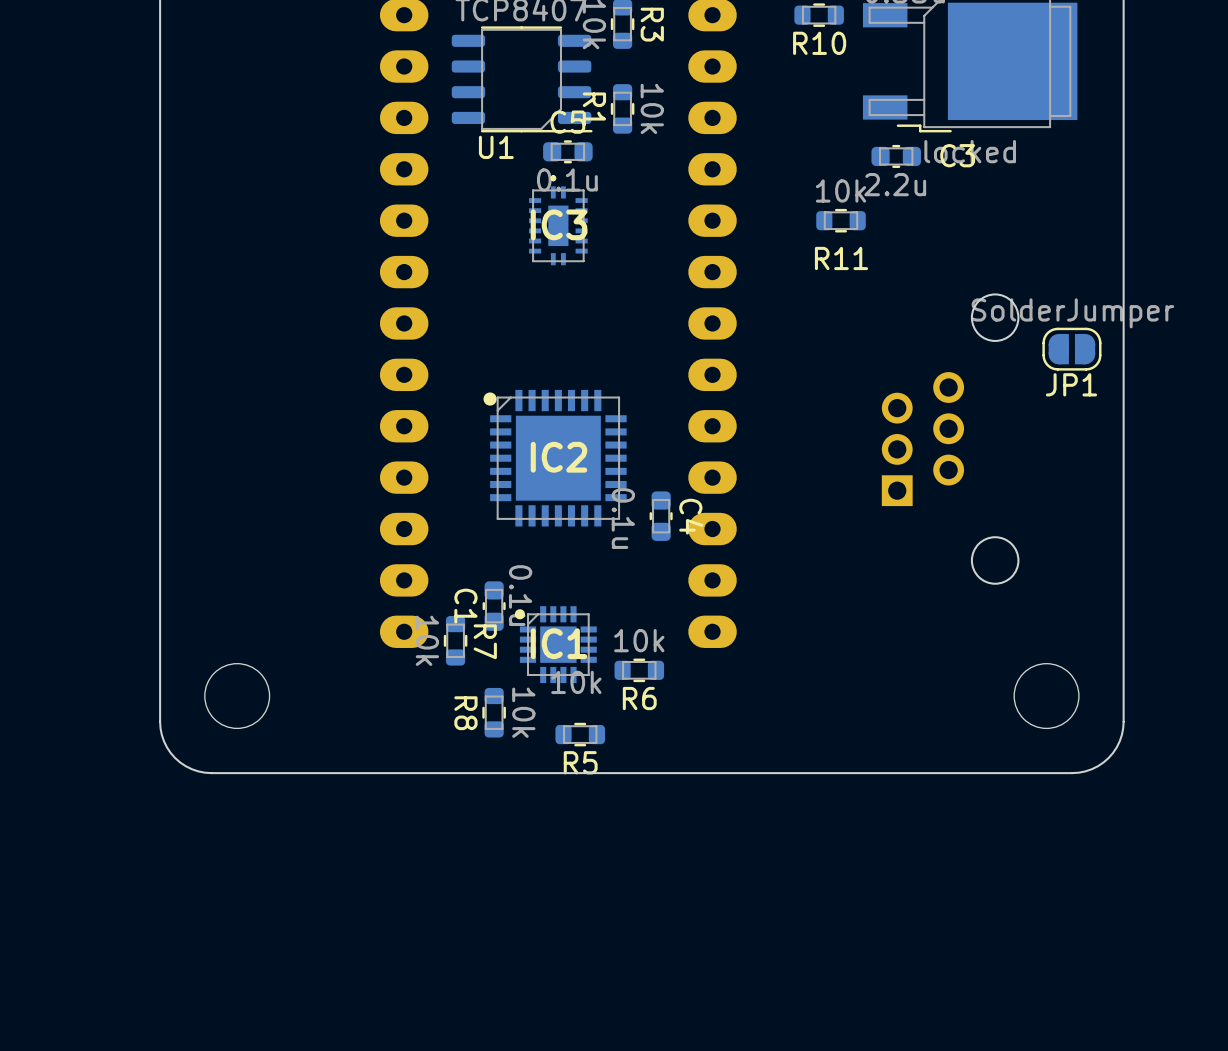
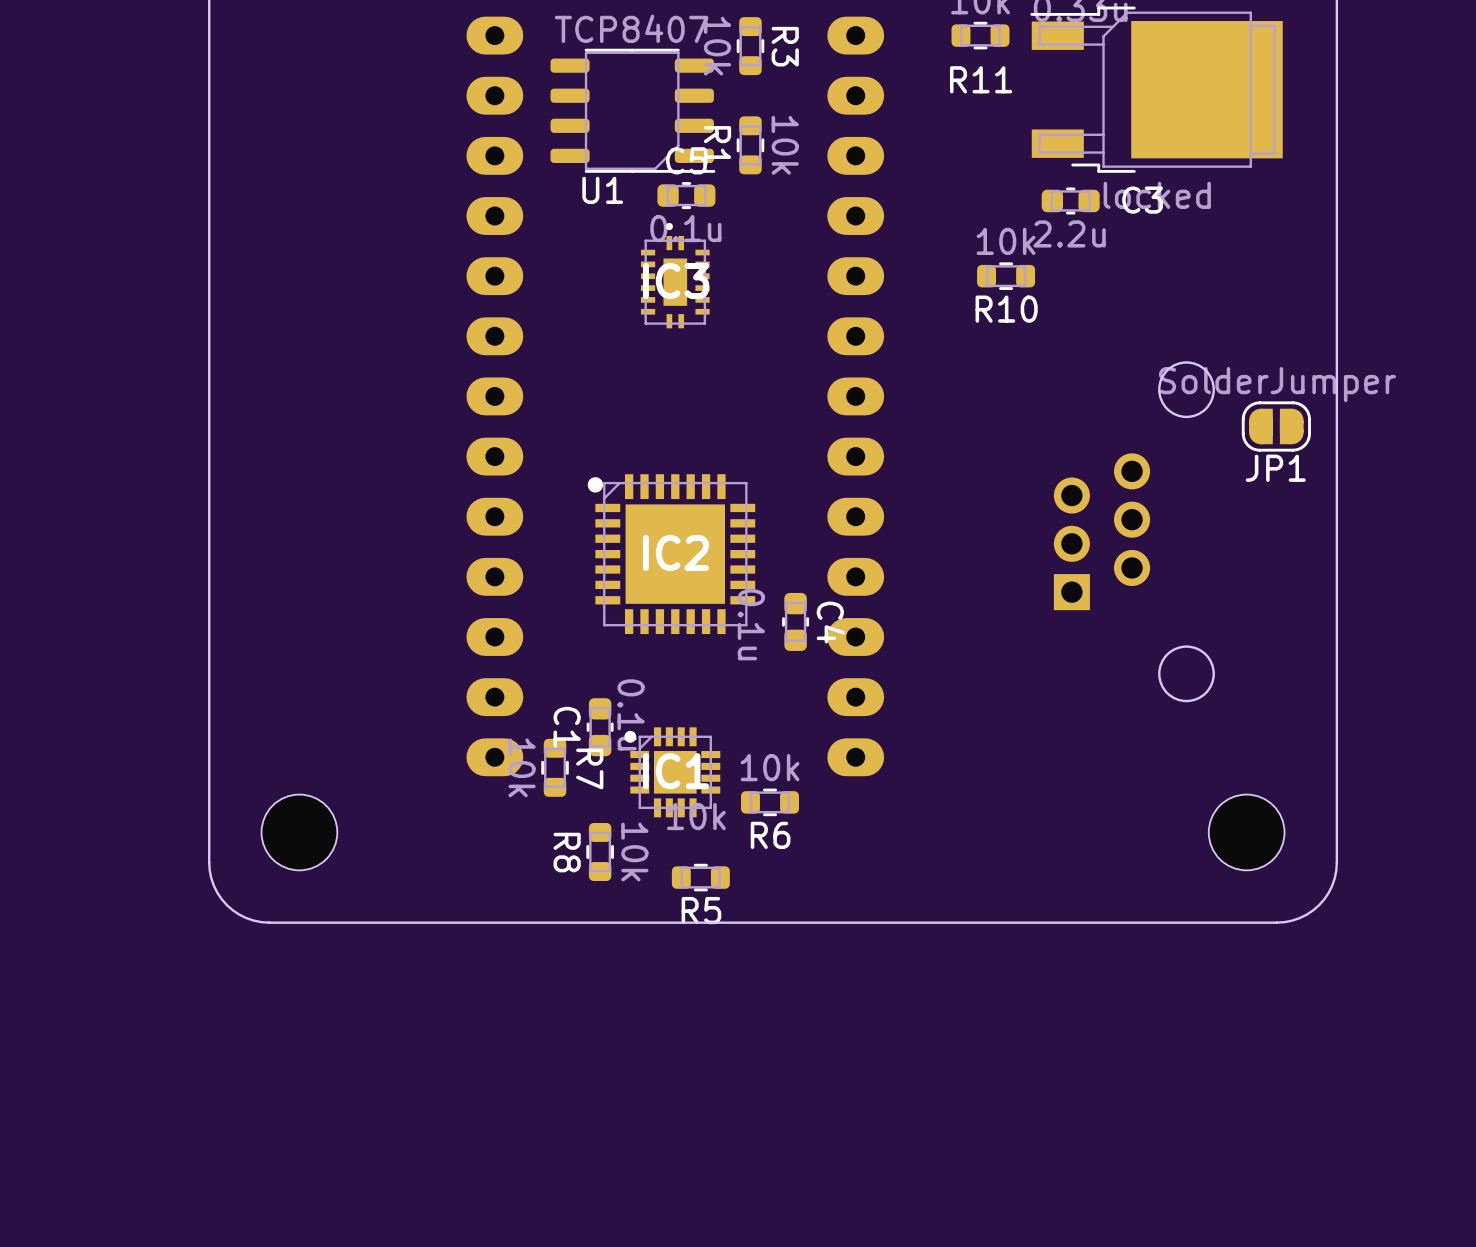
R10 name: R10 (819, 43) -> R11 (981, 79)
R11 name: R11 (841, 258) -> R10 (1006, 309)

